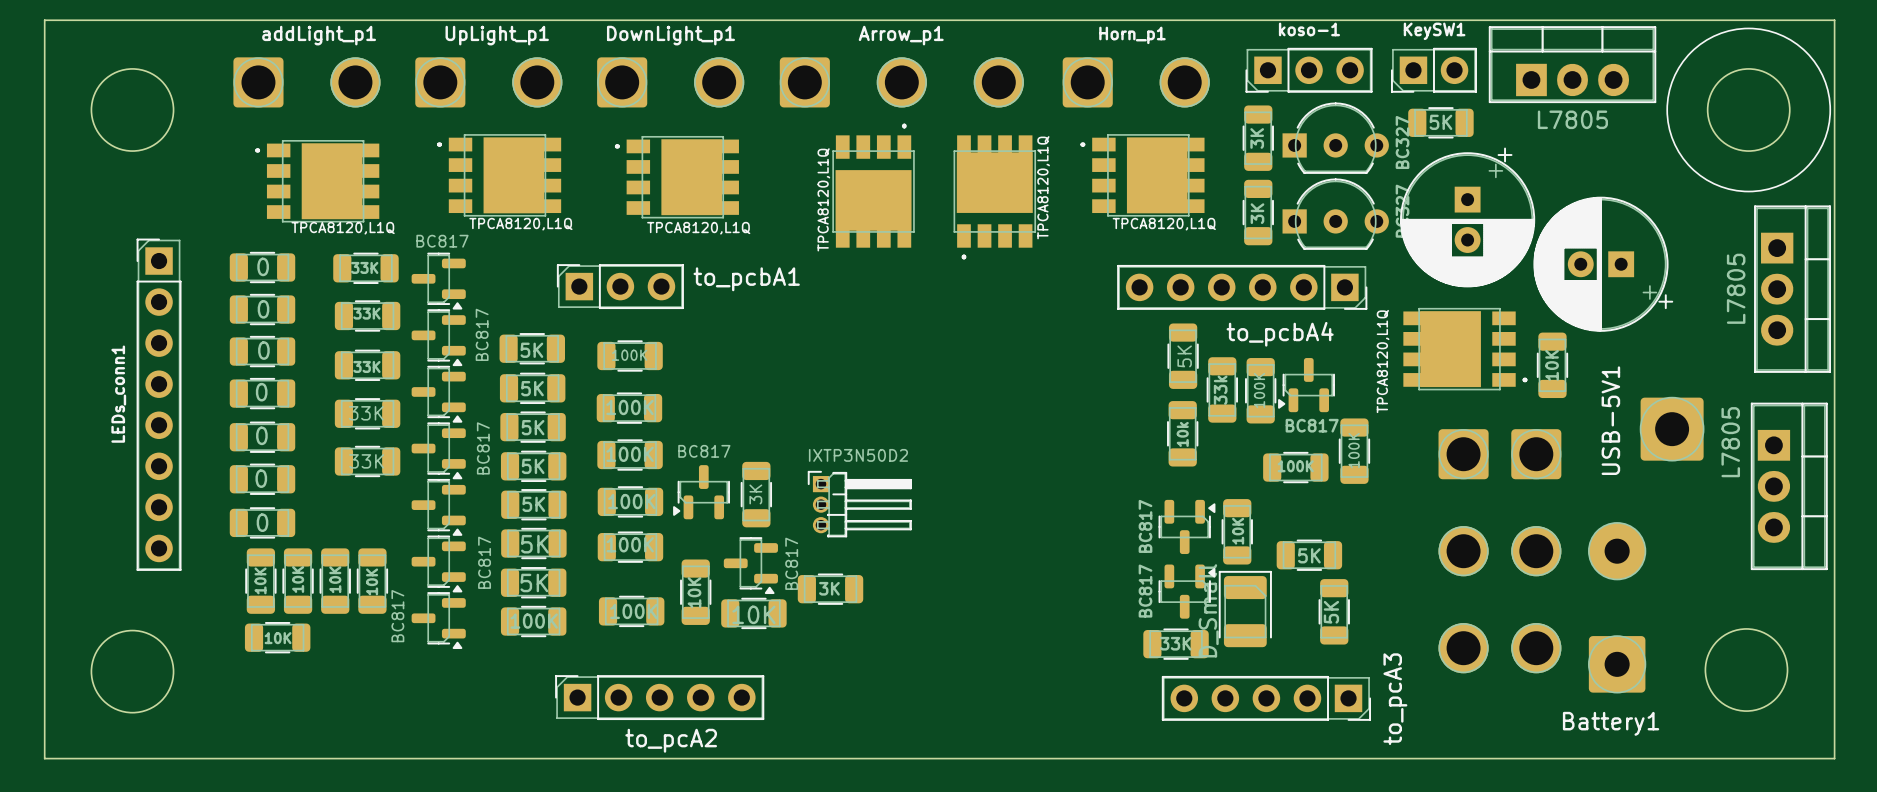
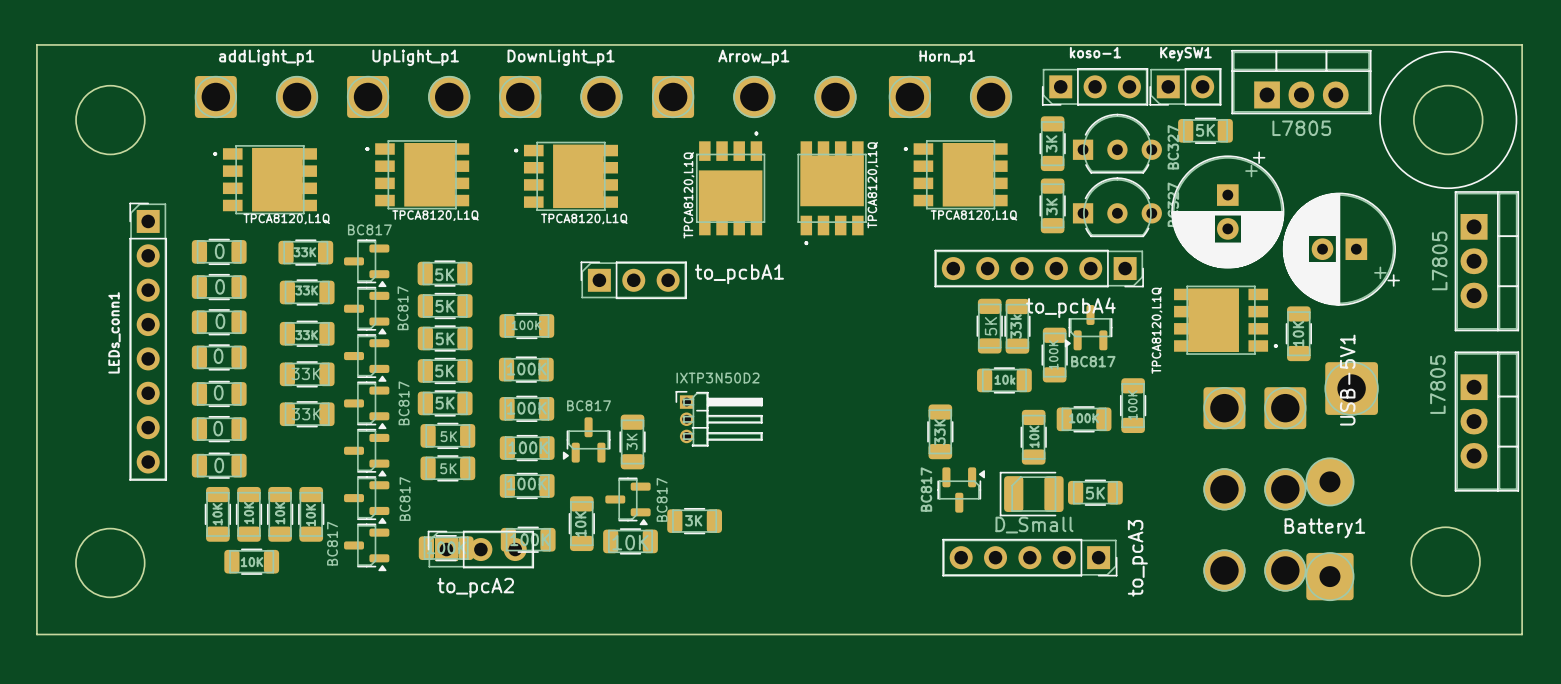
board edge: (1819, 20) (1834, 20) (1834, 758) (44, 758) (44, 724) -> (1522, 44) (1522, 634) (36, 634)
part position: (1572, 64) -> (1301, 82)
KeySW1 position: (1433, 70) -> (1185, 86)
drawing position: (1748, 109) -> (1448, 119)
round board edge position: (1748, 109) -> (1448, 119)
to_pcbA1 position: (620, 286) -> (633, 280)
part position: (1792, 289) -> (1486, 261)
part: none -> 5K (445, 273)
part: none -> 5K (445, 306)
part: 5K (532, 348) -> none
part: none -> 5K (445, 338)
part position: (1306, 385) -> (1088, 327)
part: 5K (532, 388) -> none
part position: (1222, 389) -> (1017, 326)
LEDs_conn1 position: (159, 404) -> (148, 341)
part: none -> 5K (445, 370)
part: 5K (533, 427) -> none
USB-5V1 position: (1672, 429) -> (1351, 388)
part rotation: 0° (1182, 433) -> 90° clockwise (1004, 380)
part: none -> 5K (445, 403)
part: 5K (533, 466) -> none
part position: (1789, 486) -> (1486, 421)
part: none -> 5K (447, 435)
part: 5K (533, 504) -> none
part position: (859, 504) -> (719, 418)
part: none -> 5K (447, 468)
part: BC817 (1186, 526) -> none
part position: (1237, 531) -> (1033, 437)
part: 5K (533, 543) -> none
part: none -> BC817 (961, 490)
part: 5K (533, 582) -> none
part: BC817 (1186, 591) -> none
Battery1 position: (1617, 607) -> (1329, 529)
part rotation: 0° (1245, 609) -> 90° counterclockwise (1031, 494)
part position: (1245, 609) -> (1031, 494)
part: 5K (1334, 611) -> none
part position: (277, 637) -> (251, 561)
part rotation: 0° (1176, 644) -> 90° clockwise (940, 431)
part position: (1176, 644) -> (940, 431)
round board edge position: (1746, 670) -> (1445, 561)
round board edge position: (132, 671) -> (110, 562)
to_pcA2 footprint: [555, 675, 765, 721] -> [427, 530, 535, 569]
to_pcA3 position: (1266, 698) -> (1029, 557)
Battery1 name position: Battery1 (1611, 723) -> Battery1 (1324, 528)

